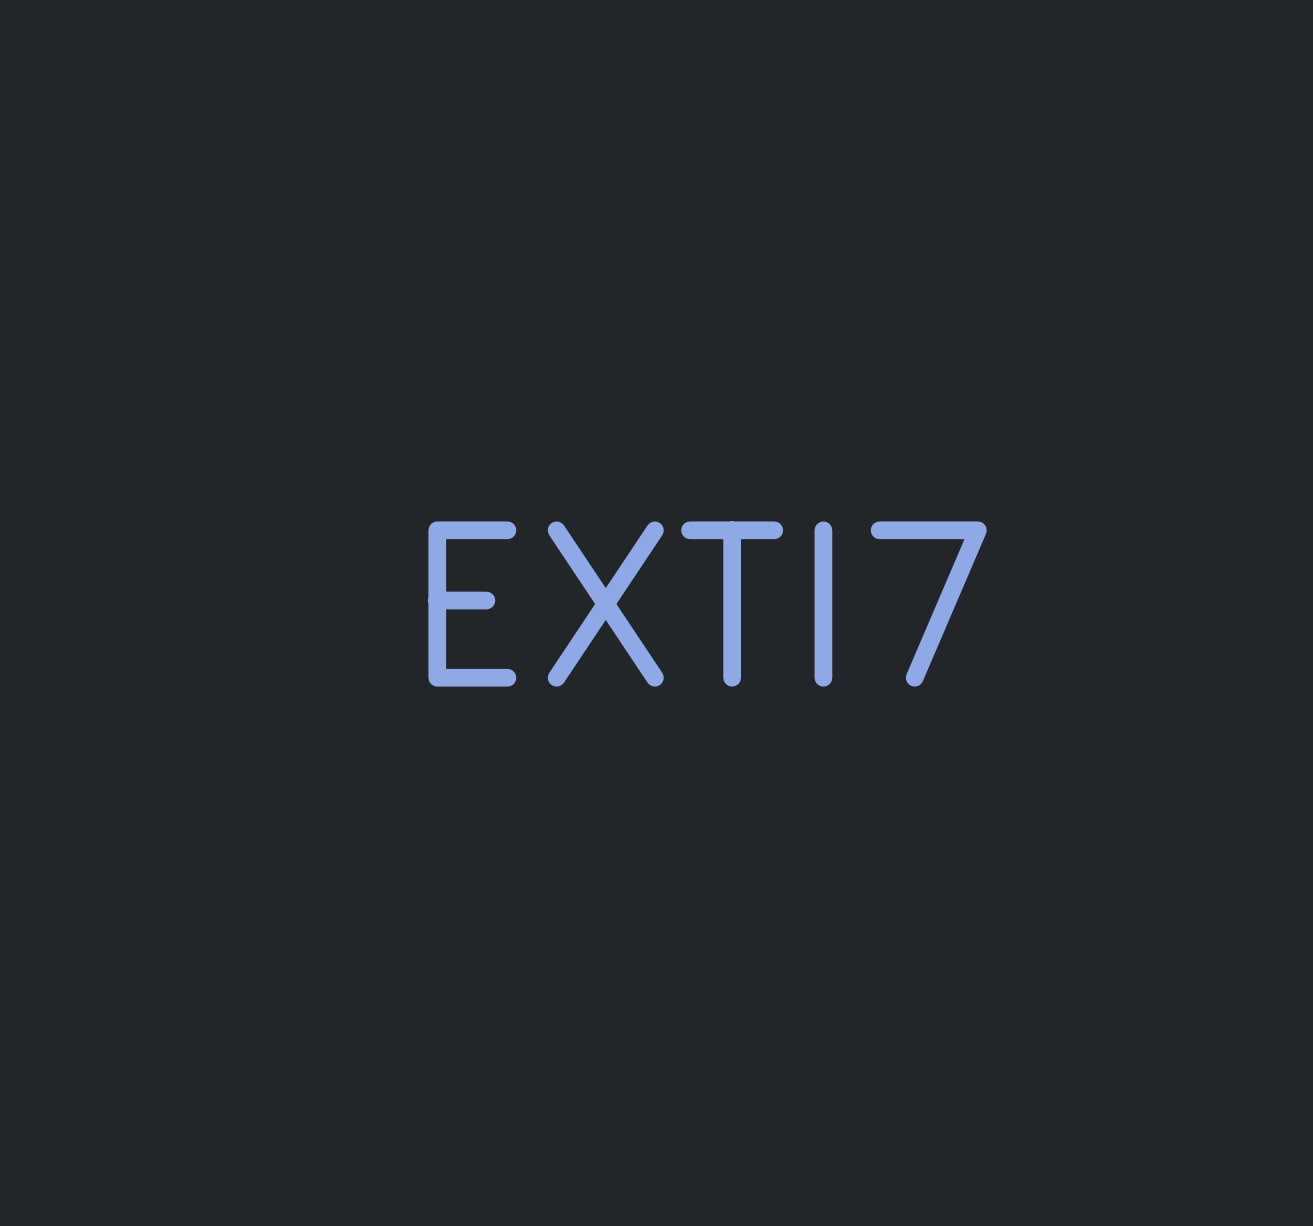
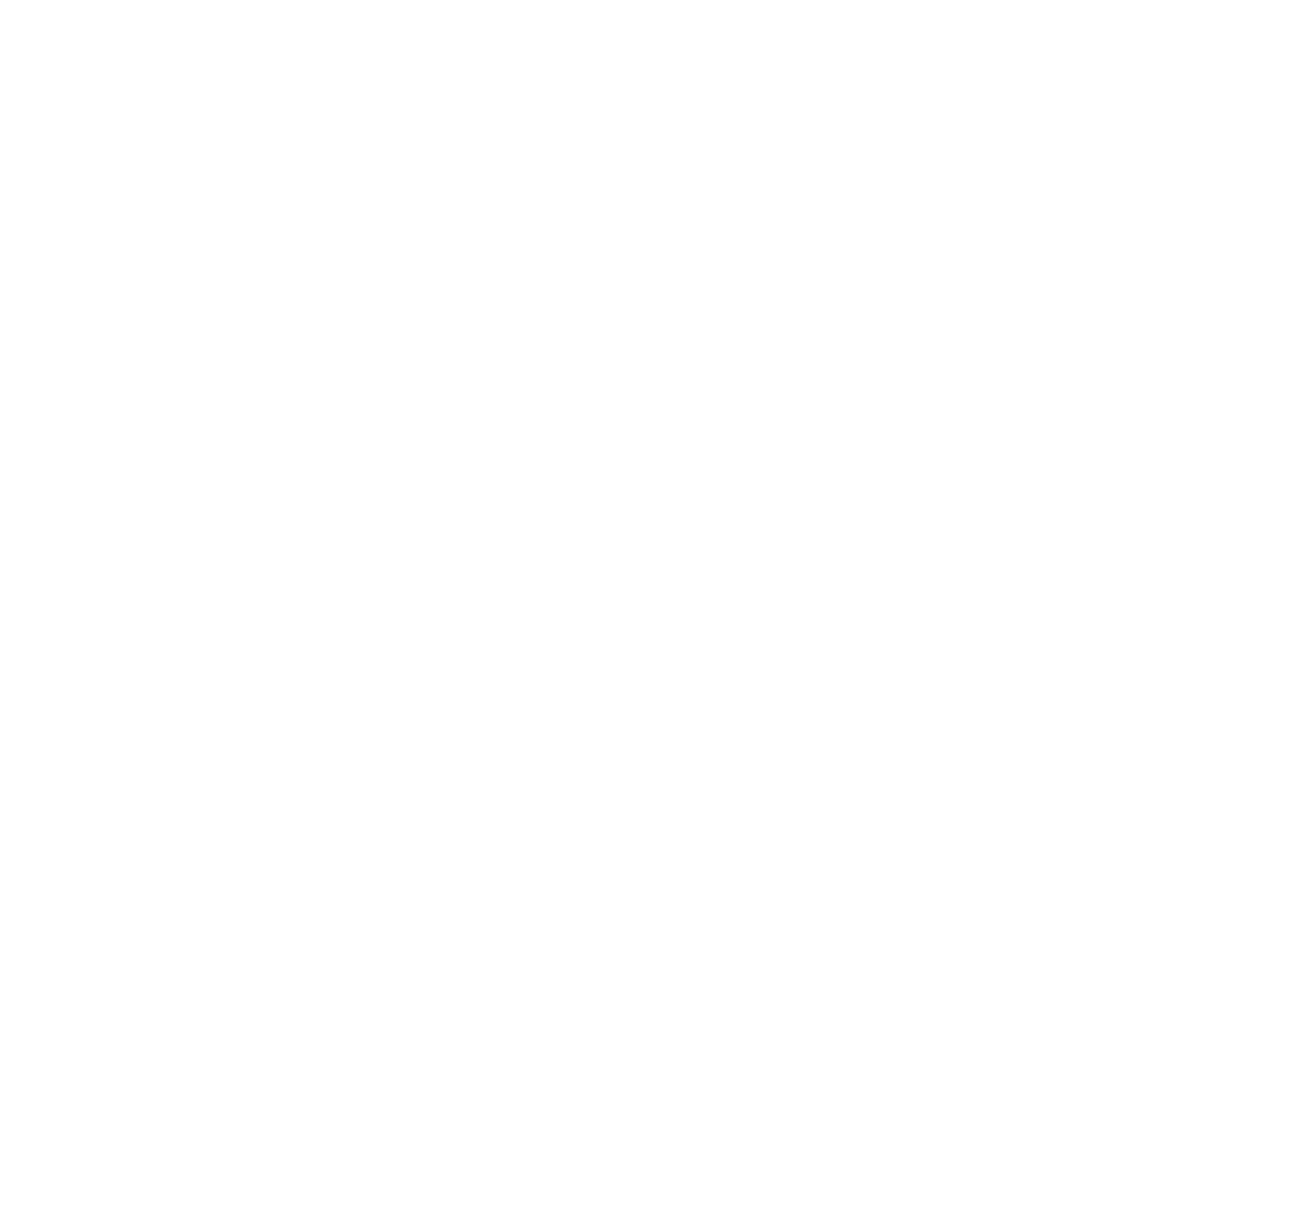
text: EXTI7 (707, 604) -> none

